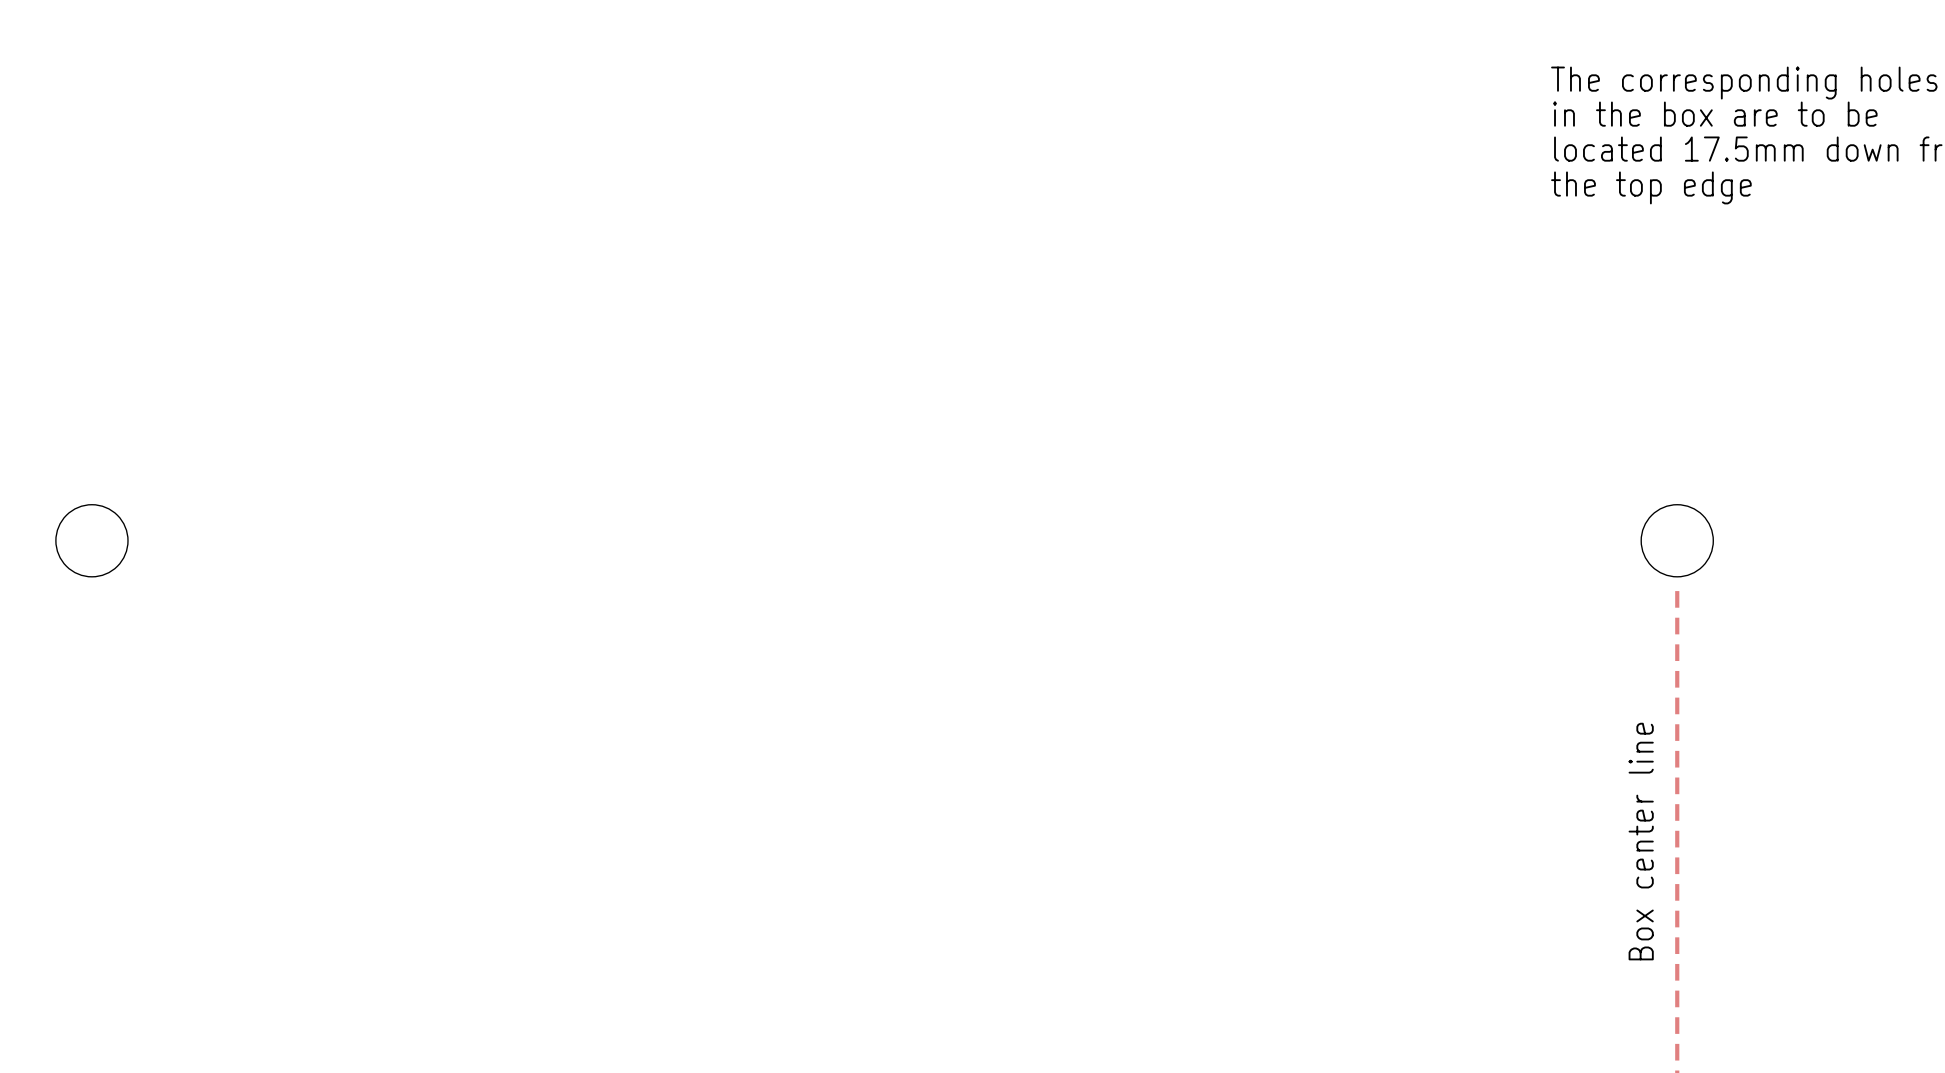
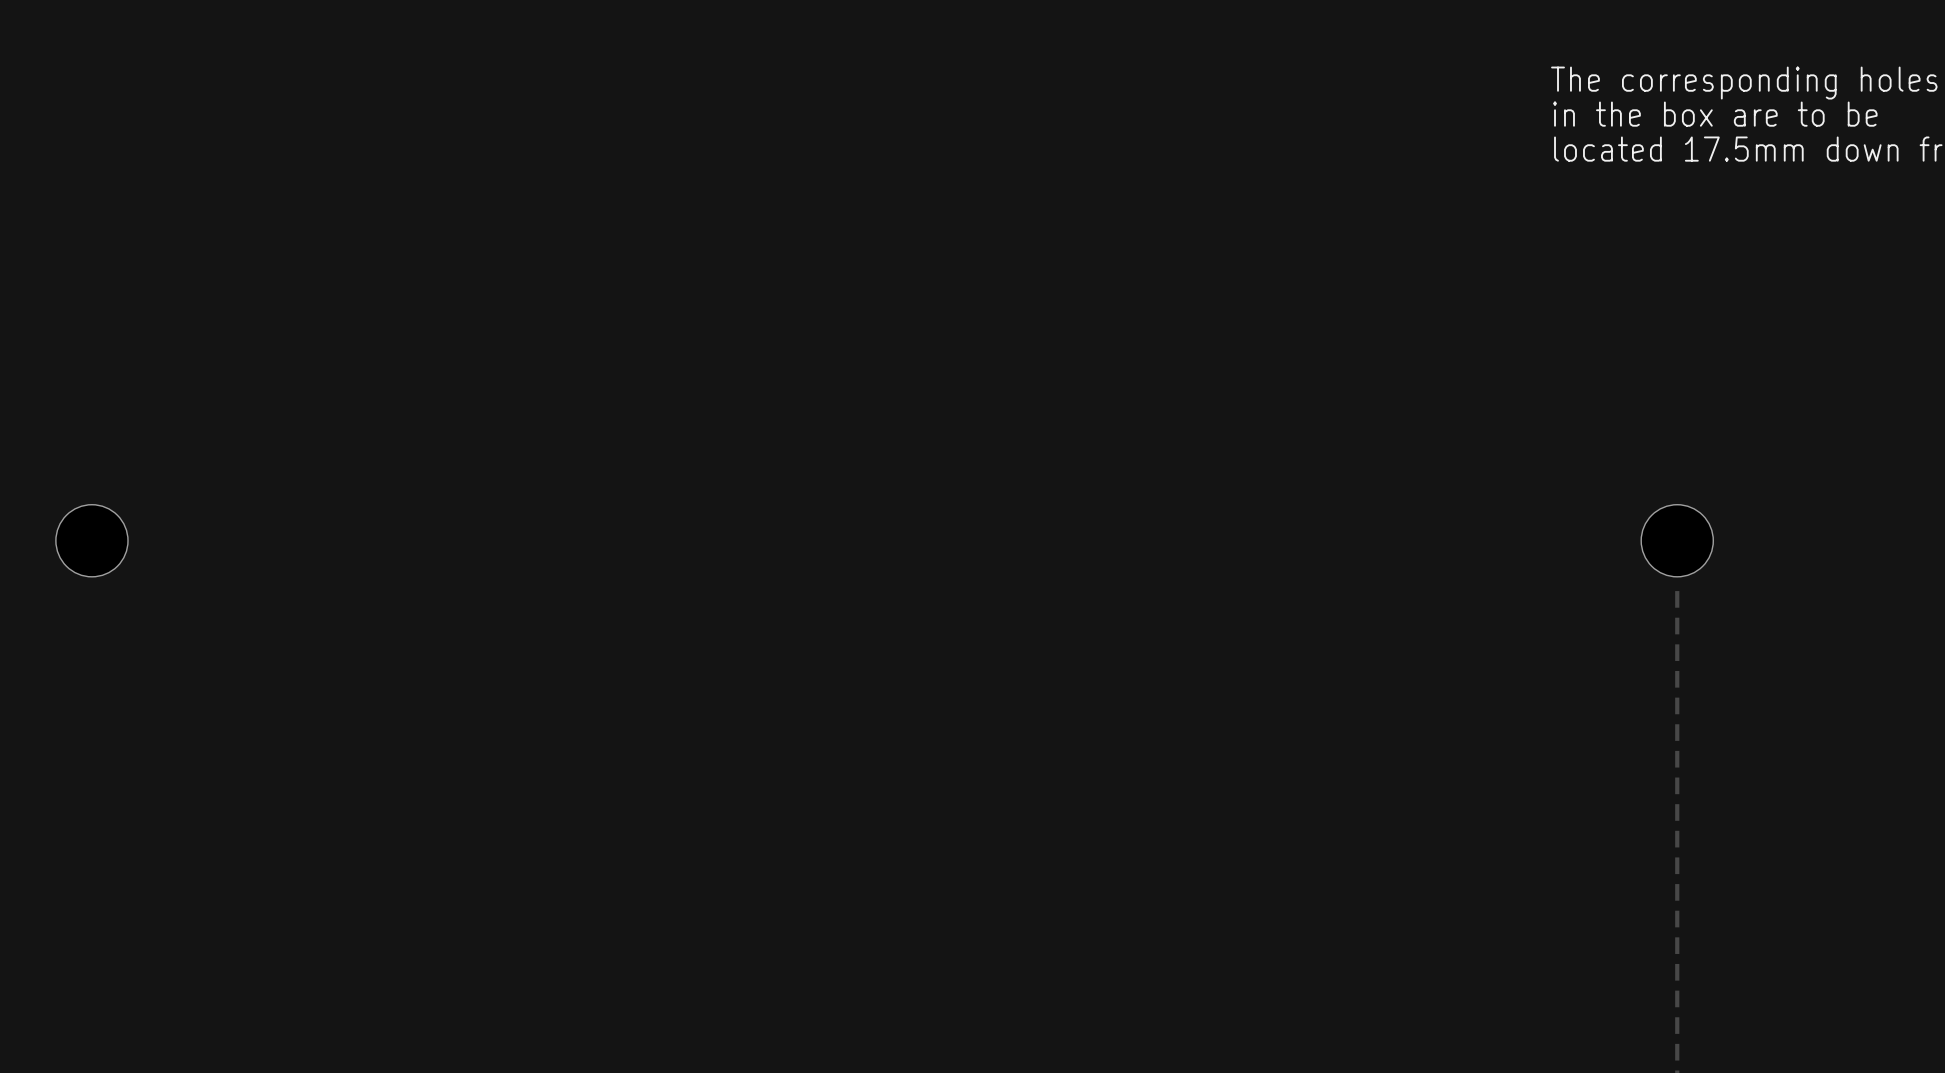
text: the top edge (1651, 187) -> none
text: Box center line (1641, 841) -> none

